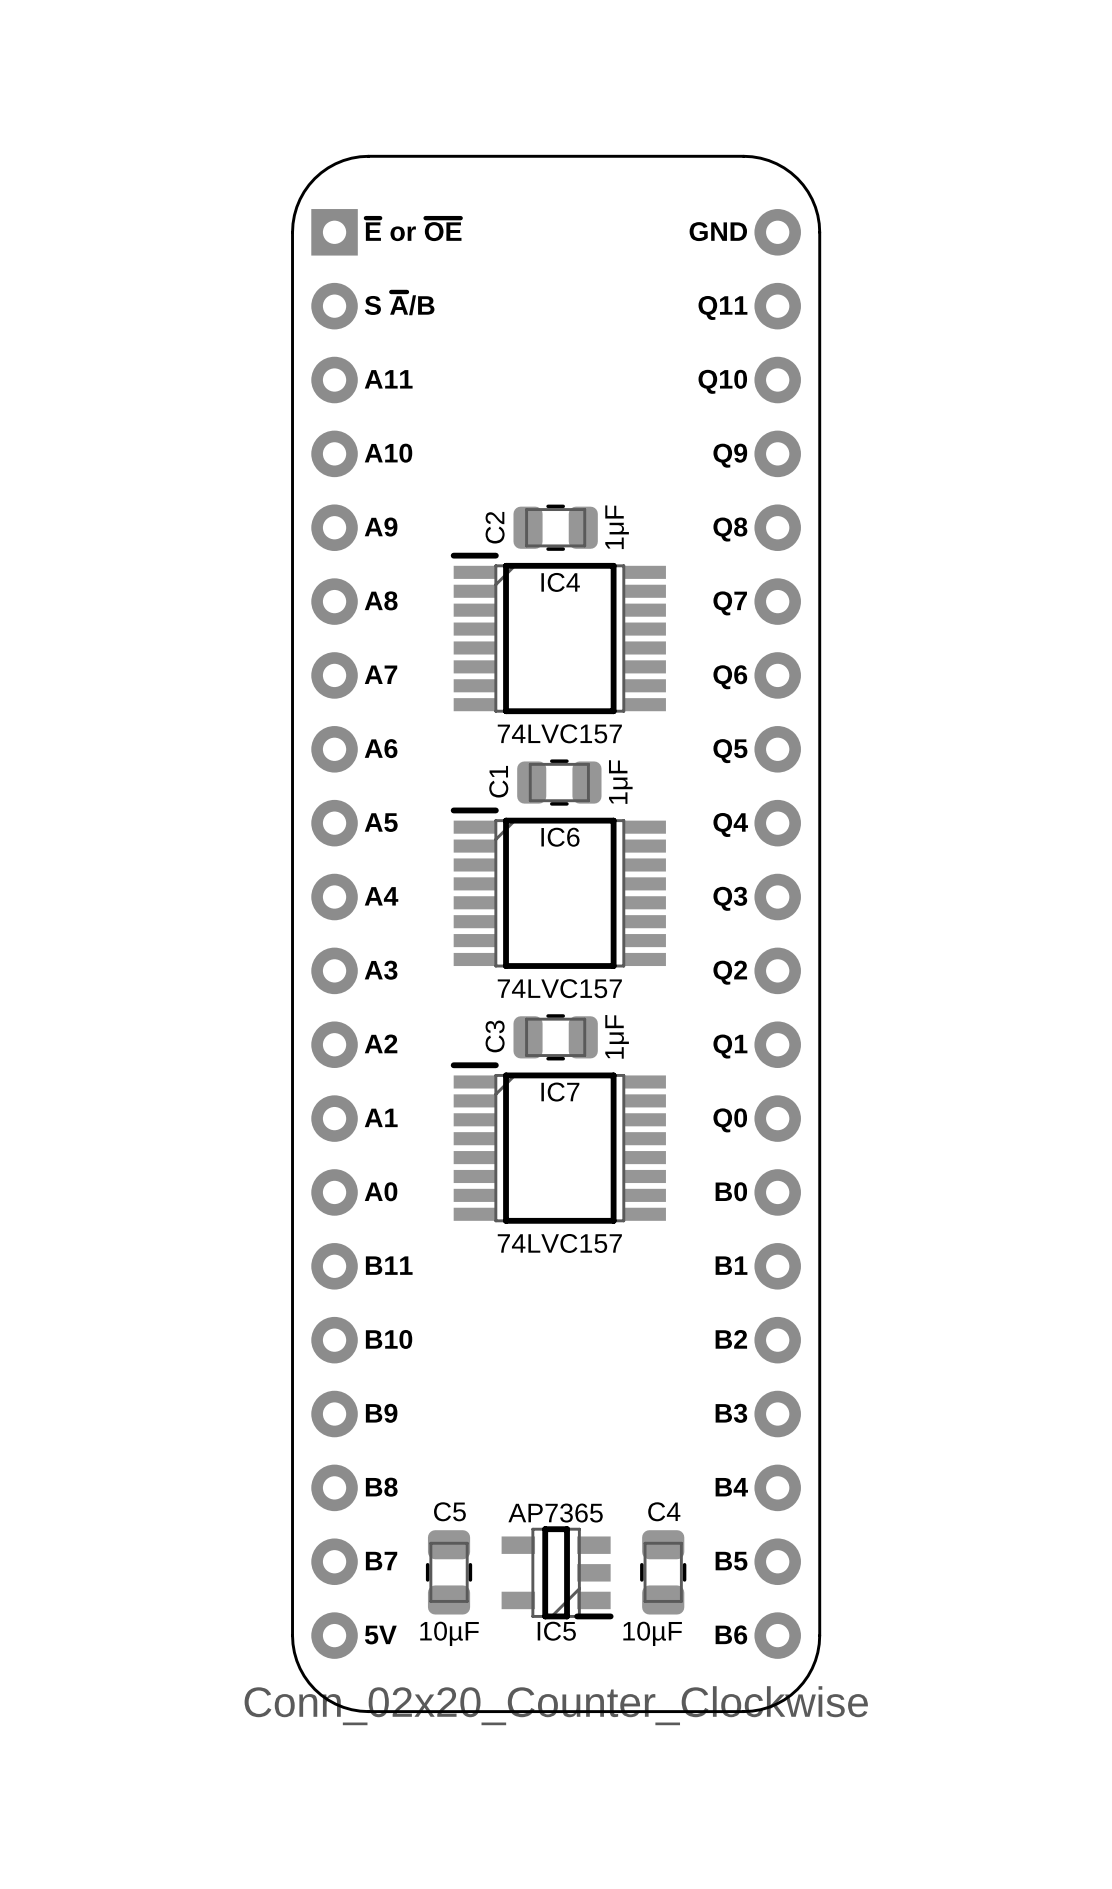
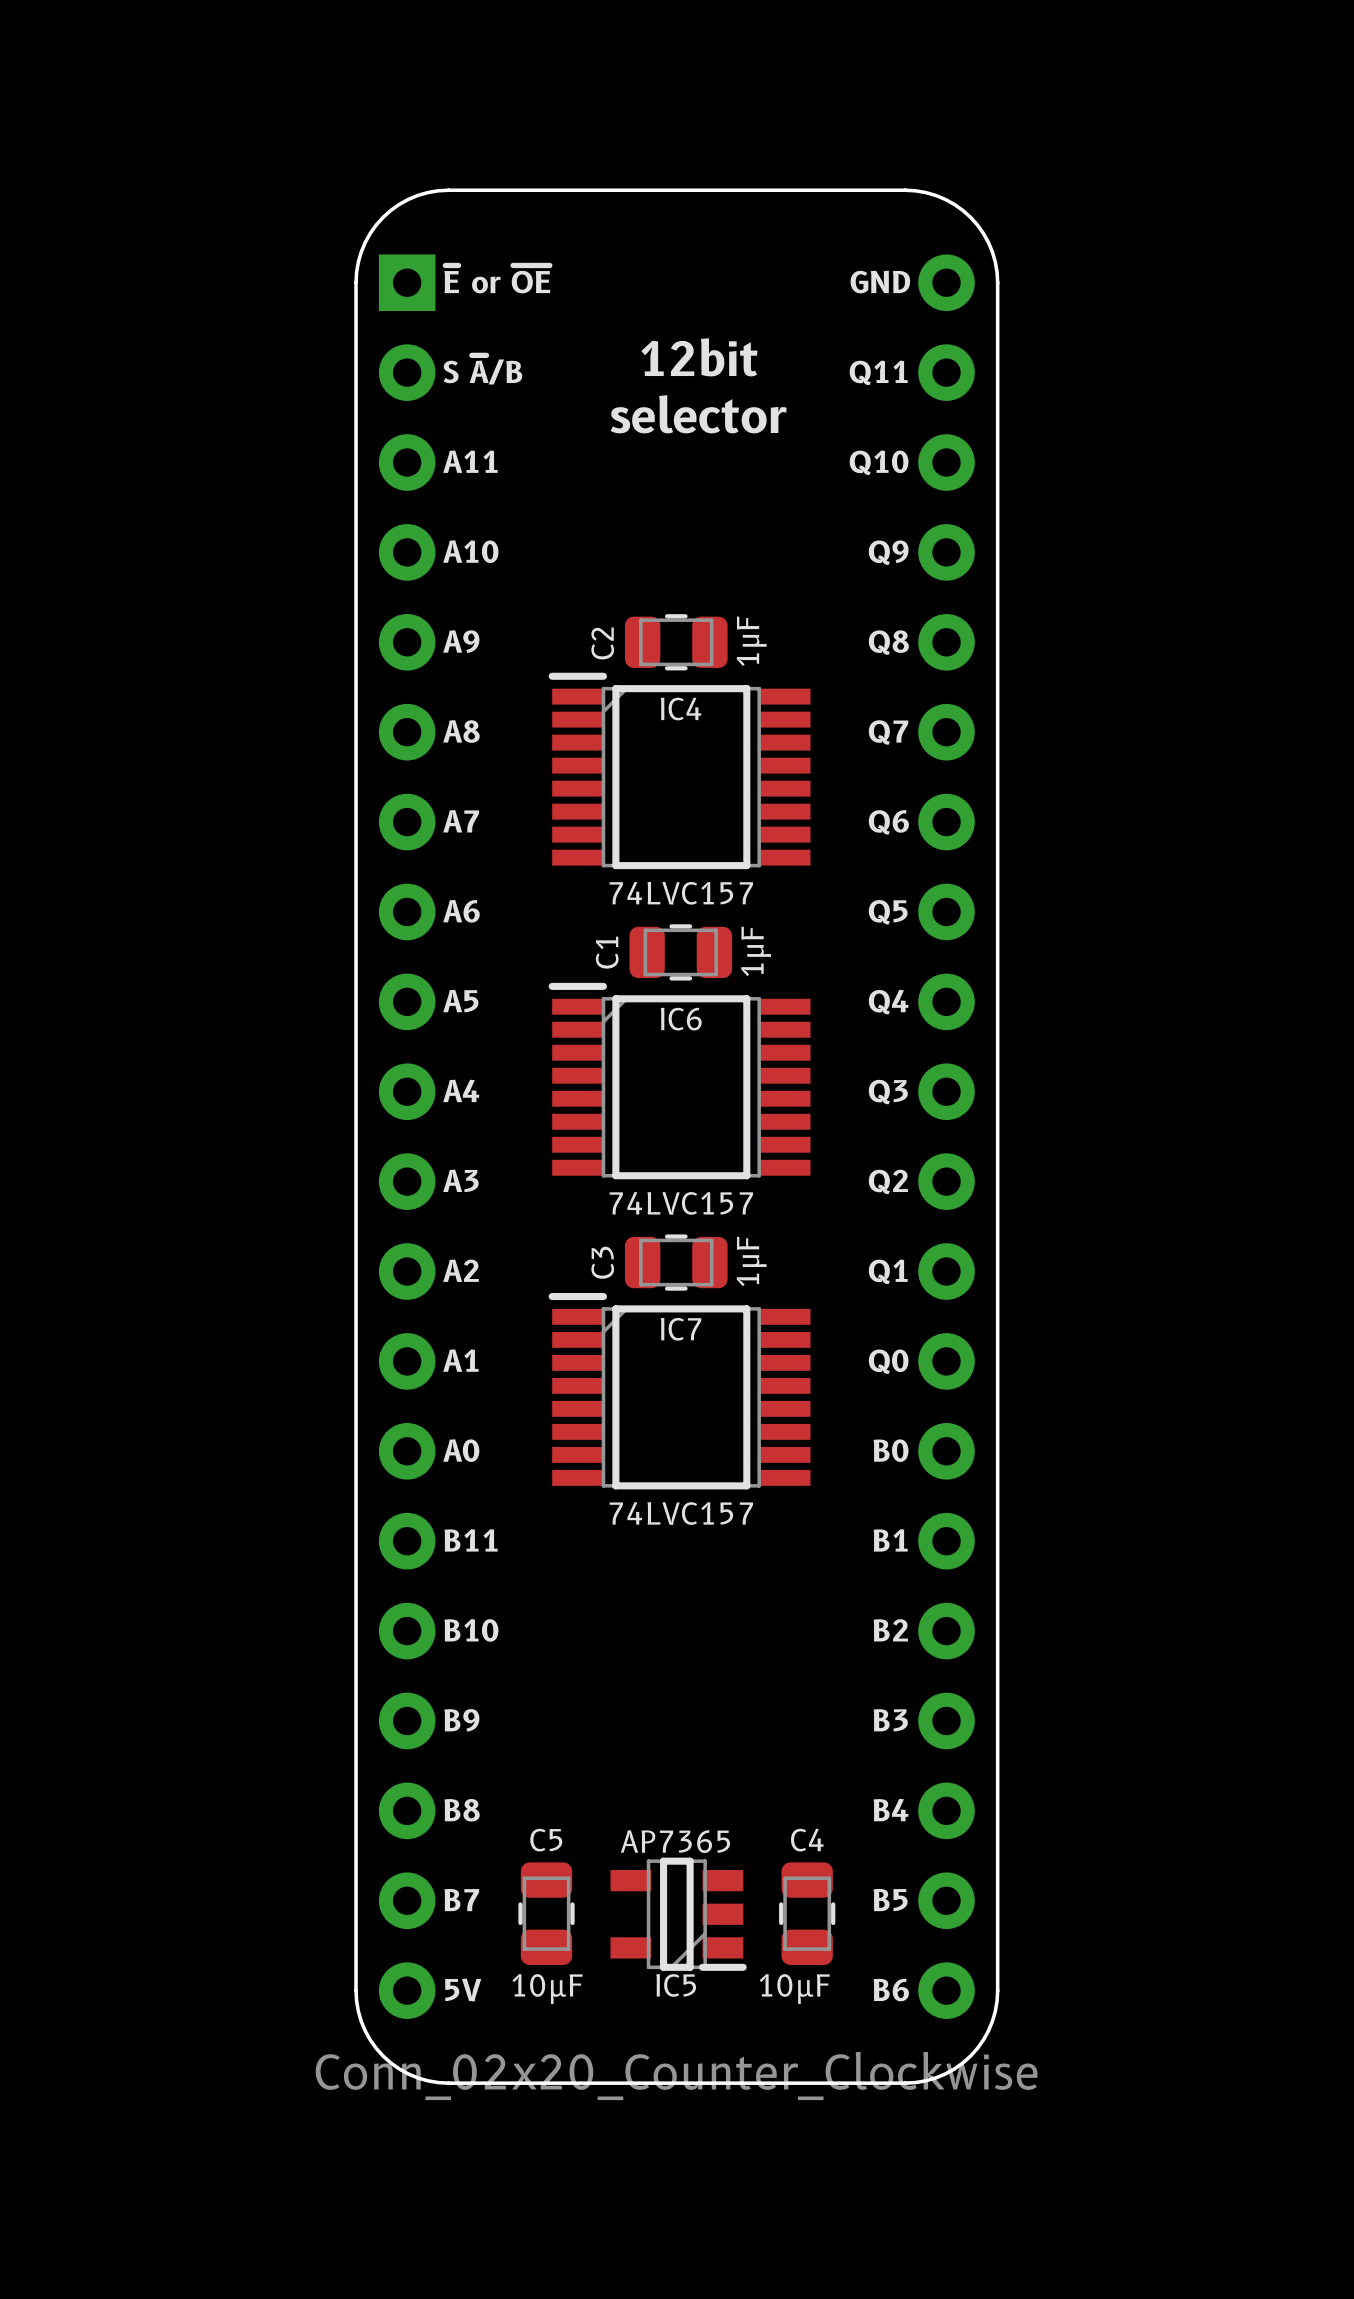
text: none -> 12bit (699, 357)
text: none -> selector (698, 414)

